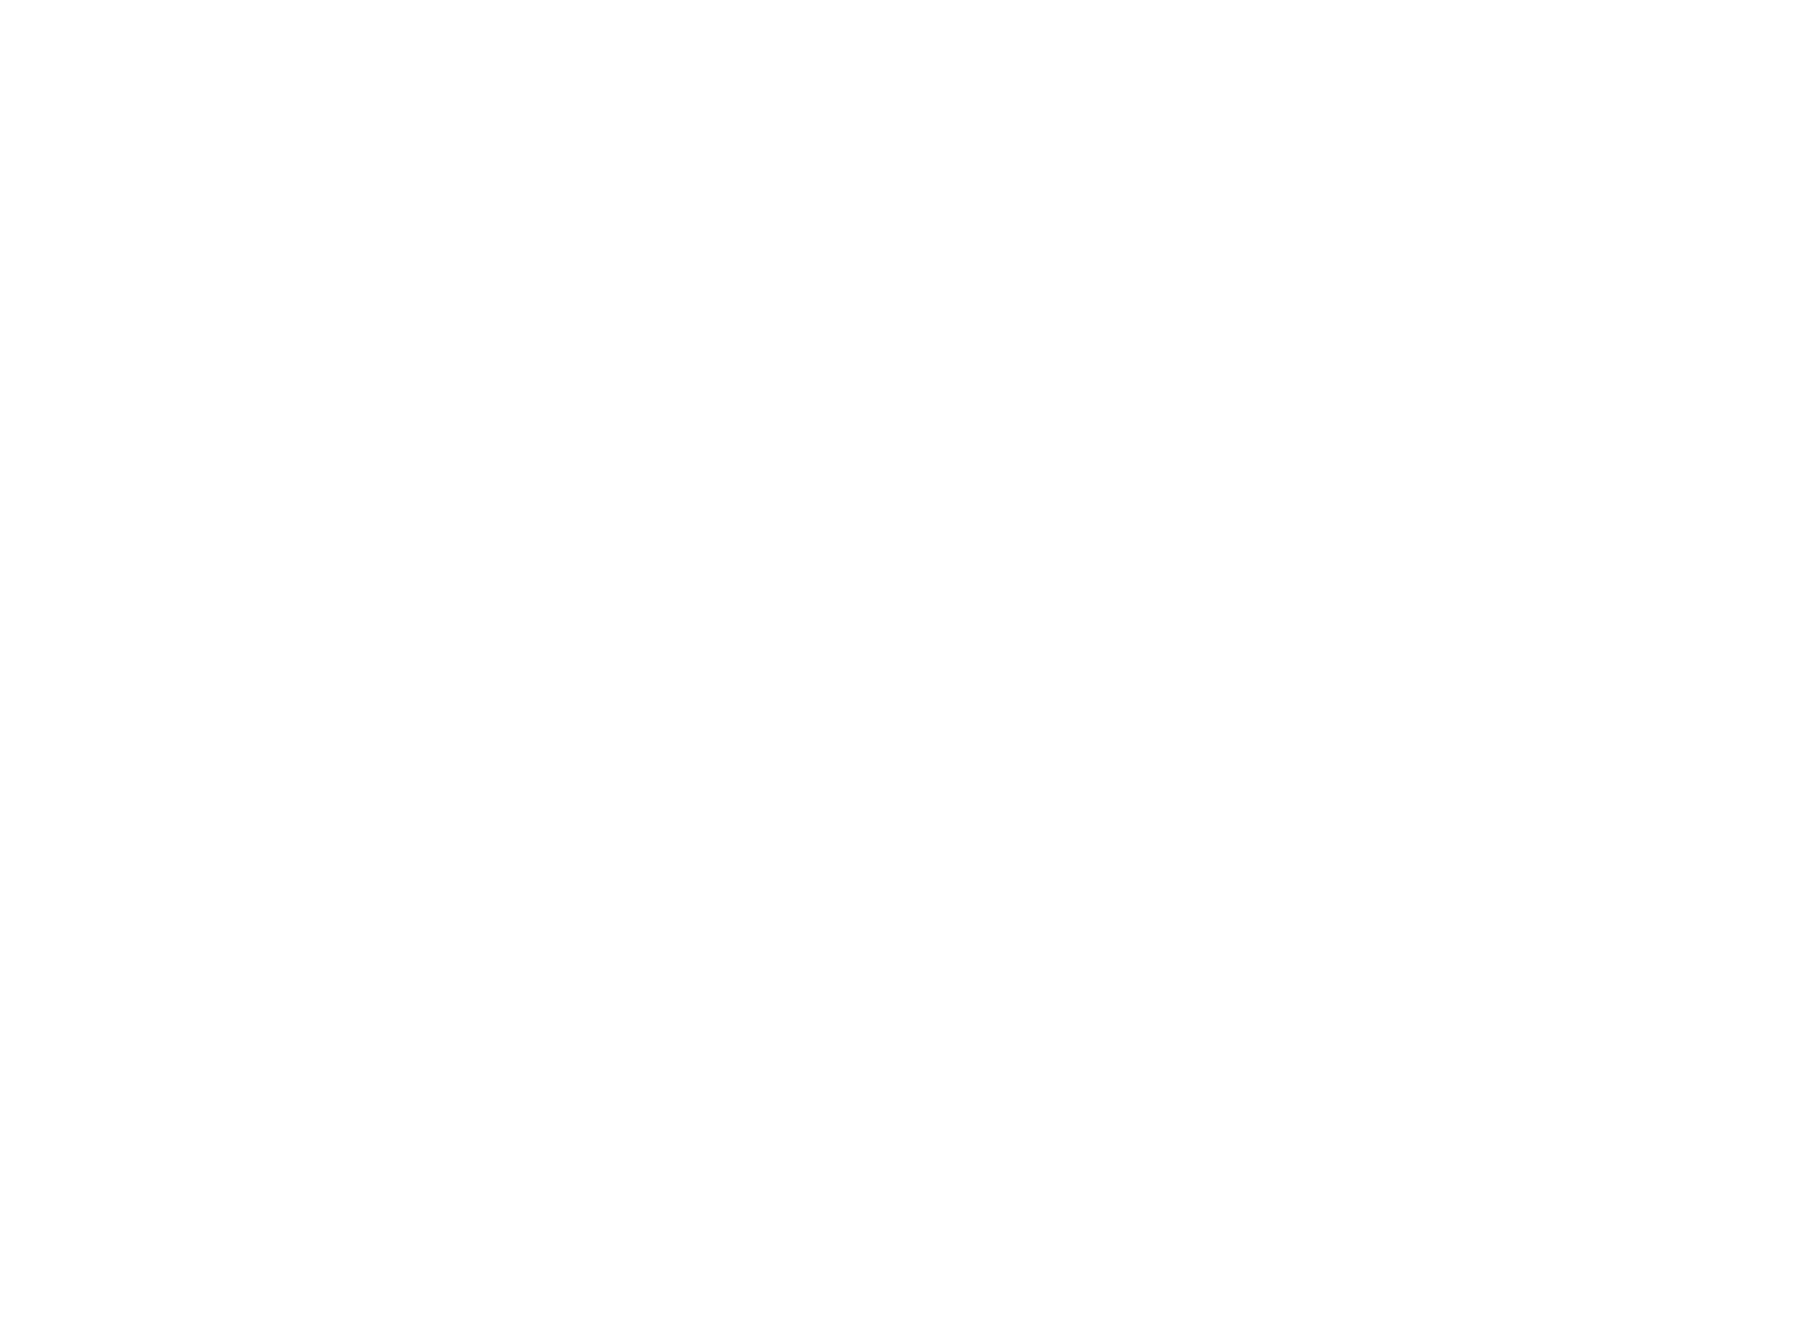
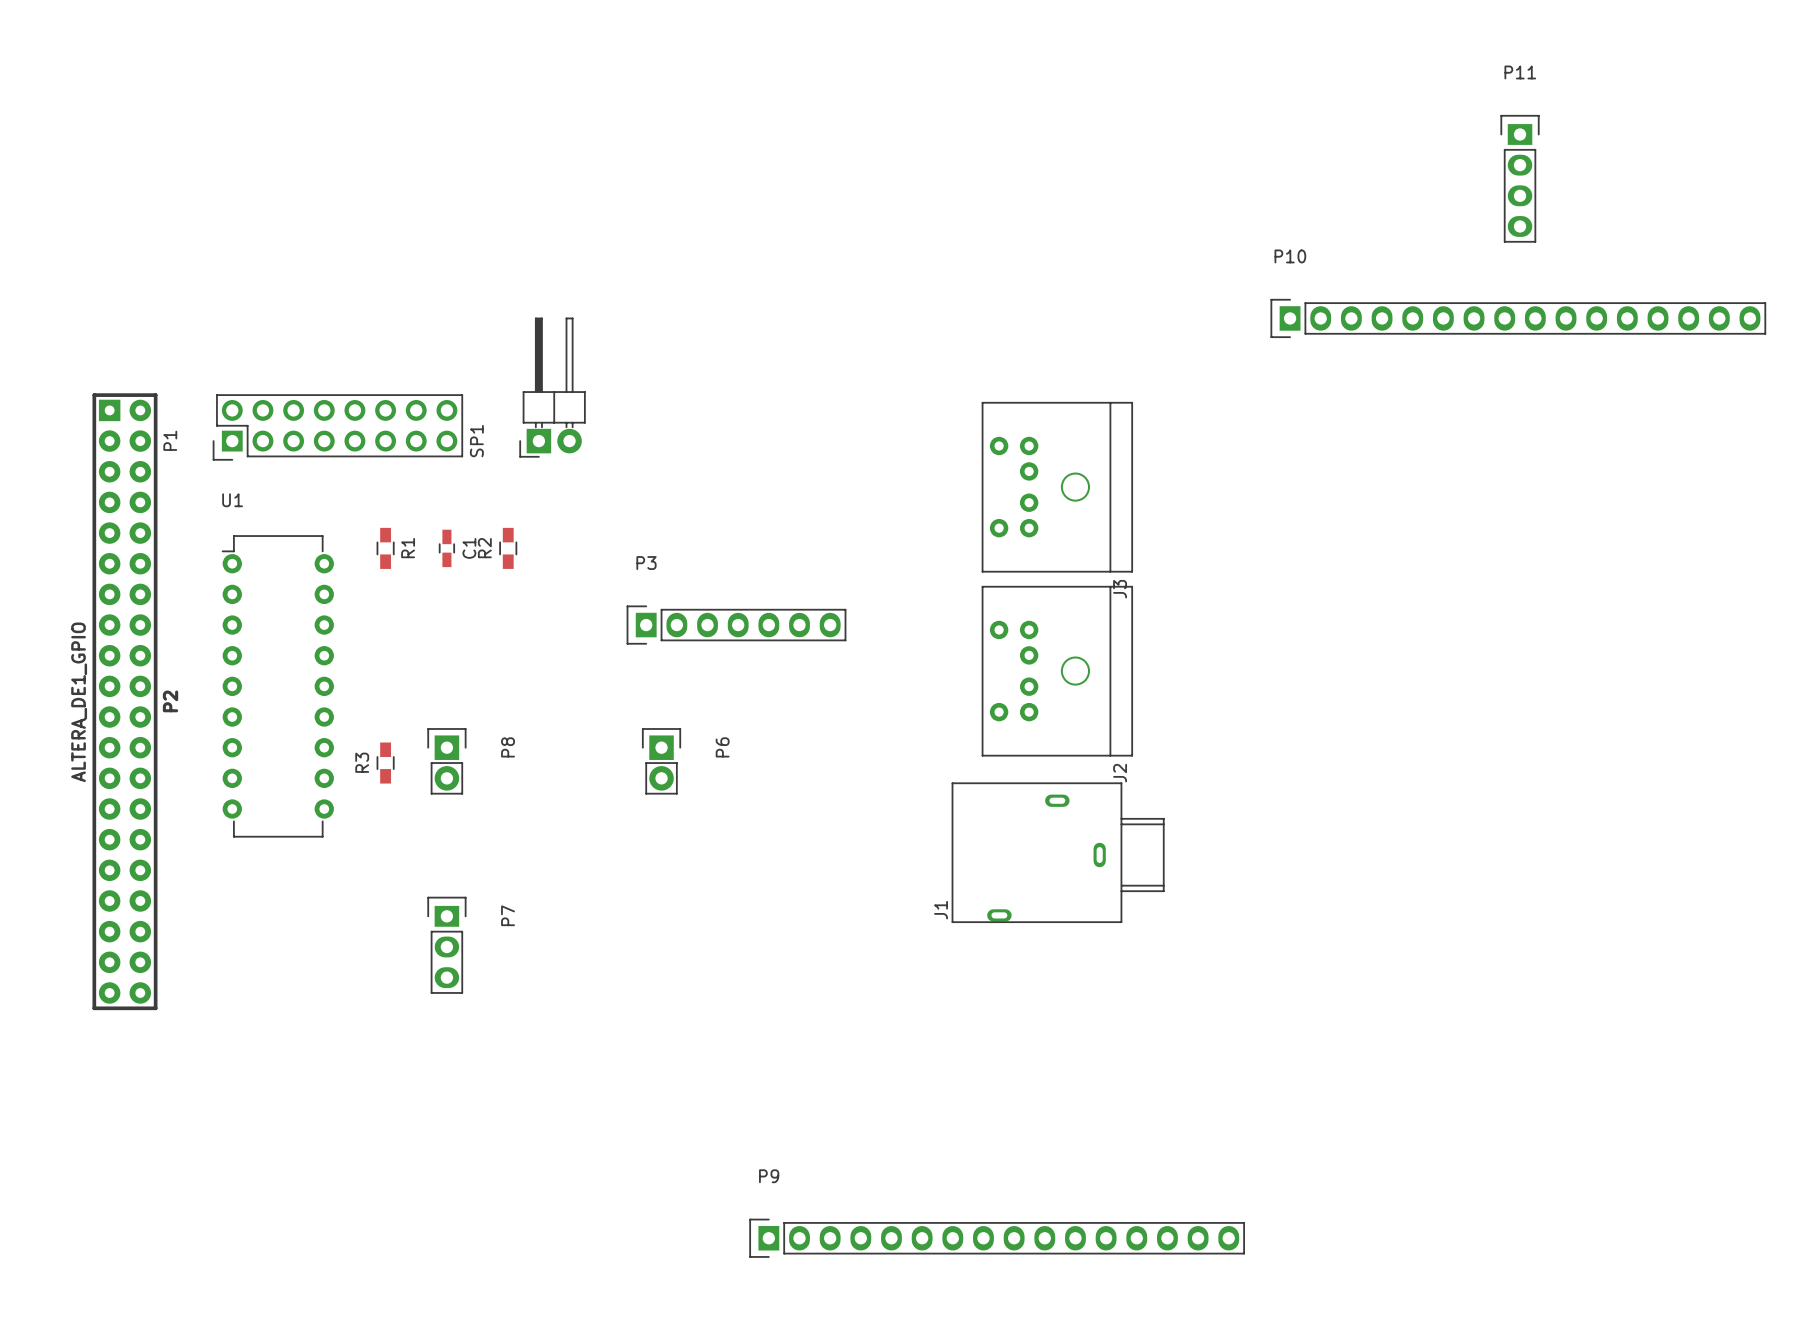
P11: none -> (1520, 178)
P10: none -> (1518, 318)
SP1: none -> (552, 387)
P1: none -> (337, 427)
J3: none -> (1057, 487)
R1: none -> (385, 548)
C1: none -> (446, 548)
R2: none -> (508, 548)
P3: none -> (736, 625)
J2: none -> (1057, 671)
U1: none -> (277, 686)
P2: none -> ALTERA_DE1_GPIO (124, 701)
P8: none -> (446, 761)
P6: none -> (661, 761)
R3: none -> (385, 763)
J1: none -> (1058, 852)
P7: none -> (446, 945)
P9: none -> (997, 1238)

